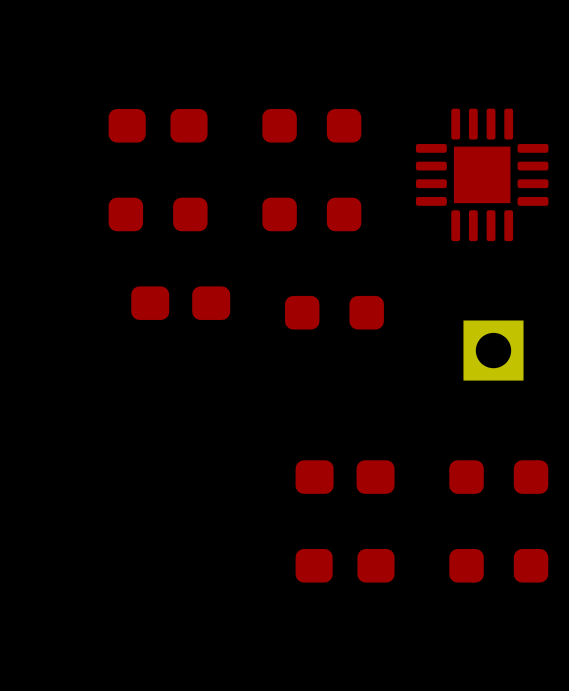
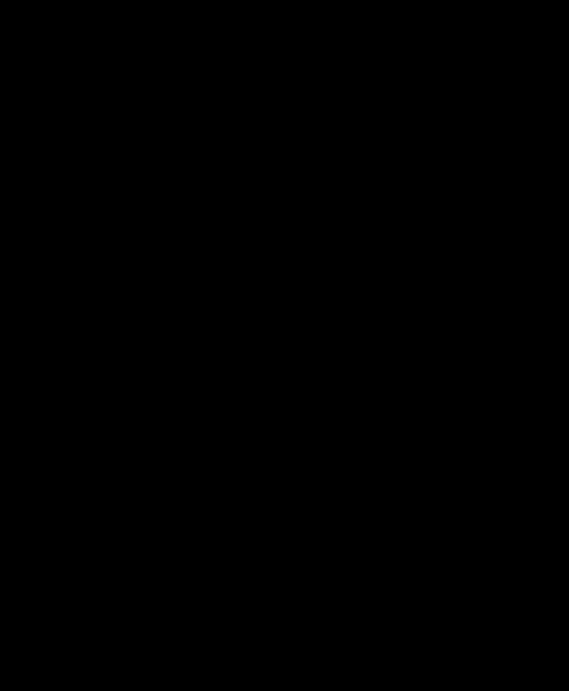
part: (158, 125) -> none
part: (311, 125) -> none
part: (482, 174) -> none
part: (158, 214) -> none
part: (311, 214) -> none
part: (180, 303) -> none
part: (334, 312) -> none
part: (493, 350) -> none
part: (345, 477) -> none
part: (498, 477) -> none
part: (345, 565) -> none
part: (498, 565) -> none

